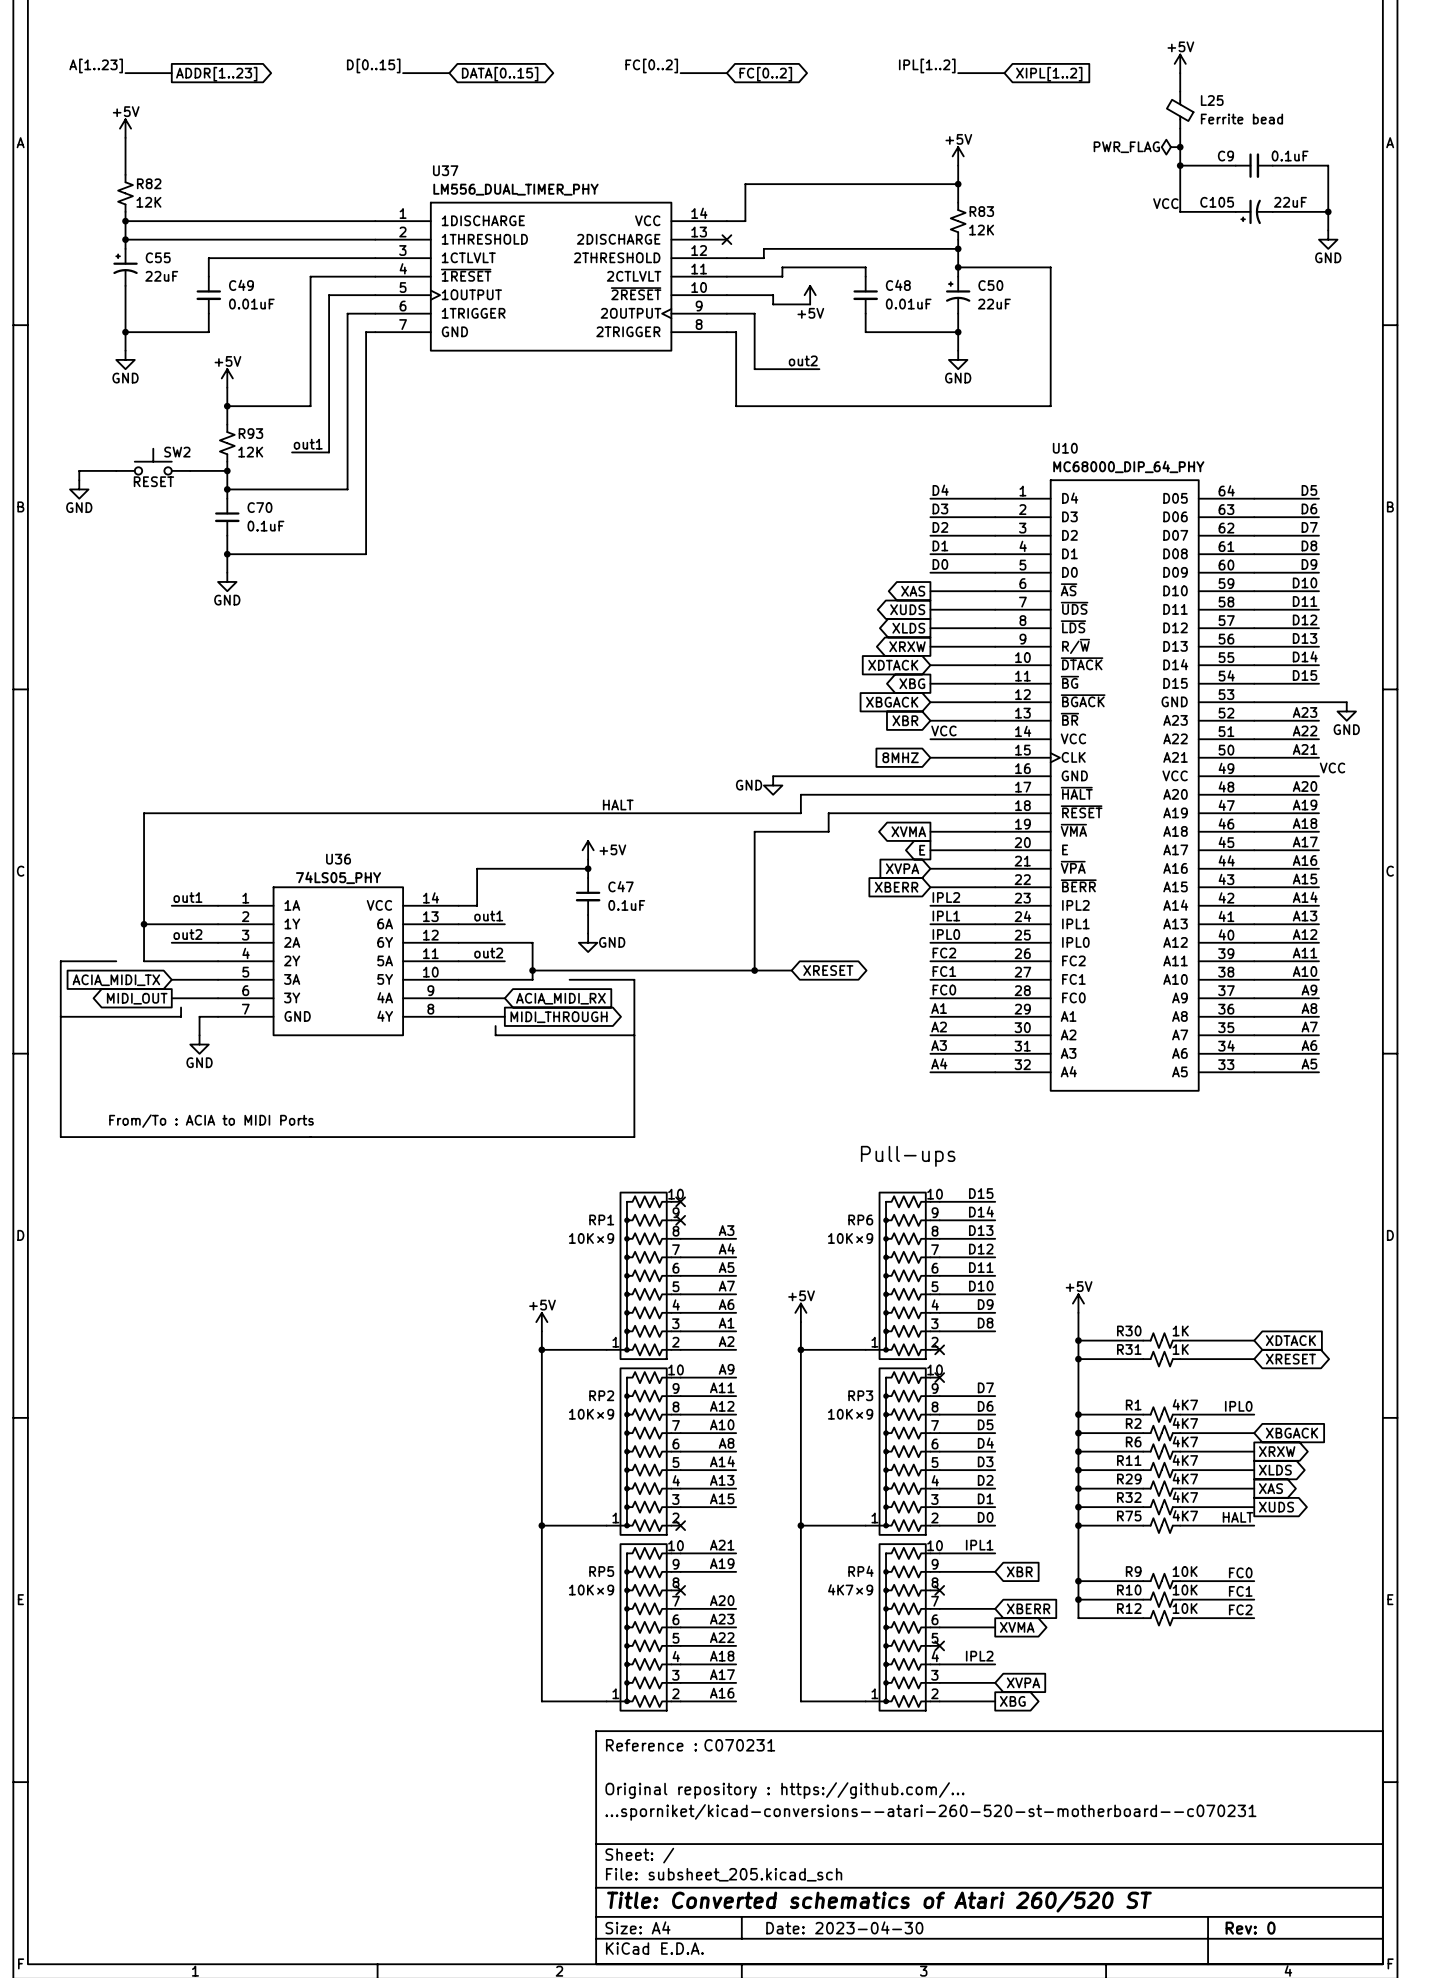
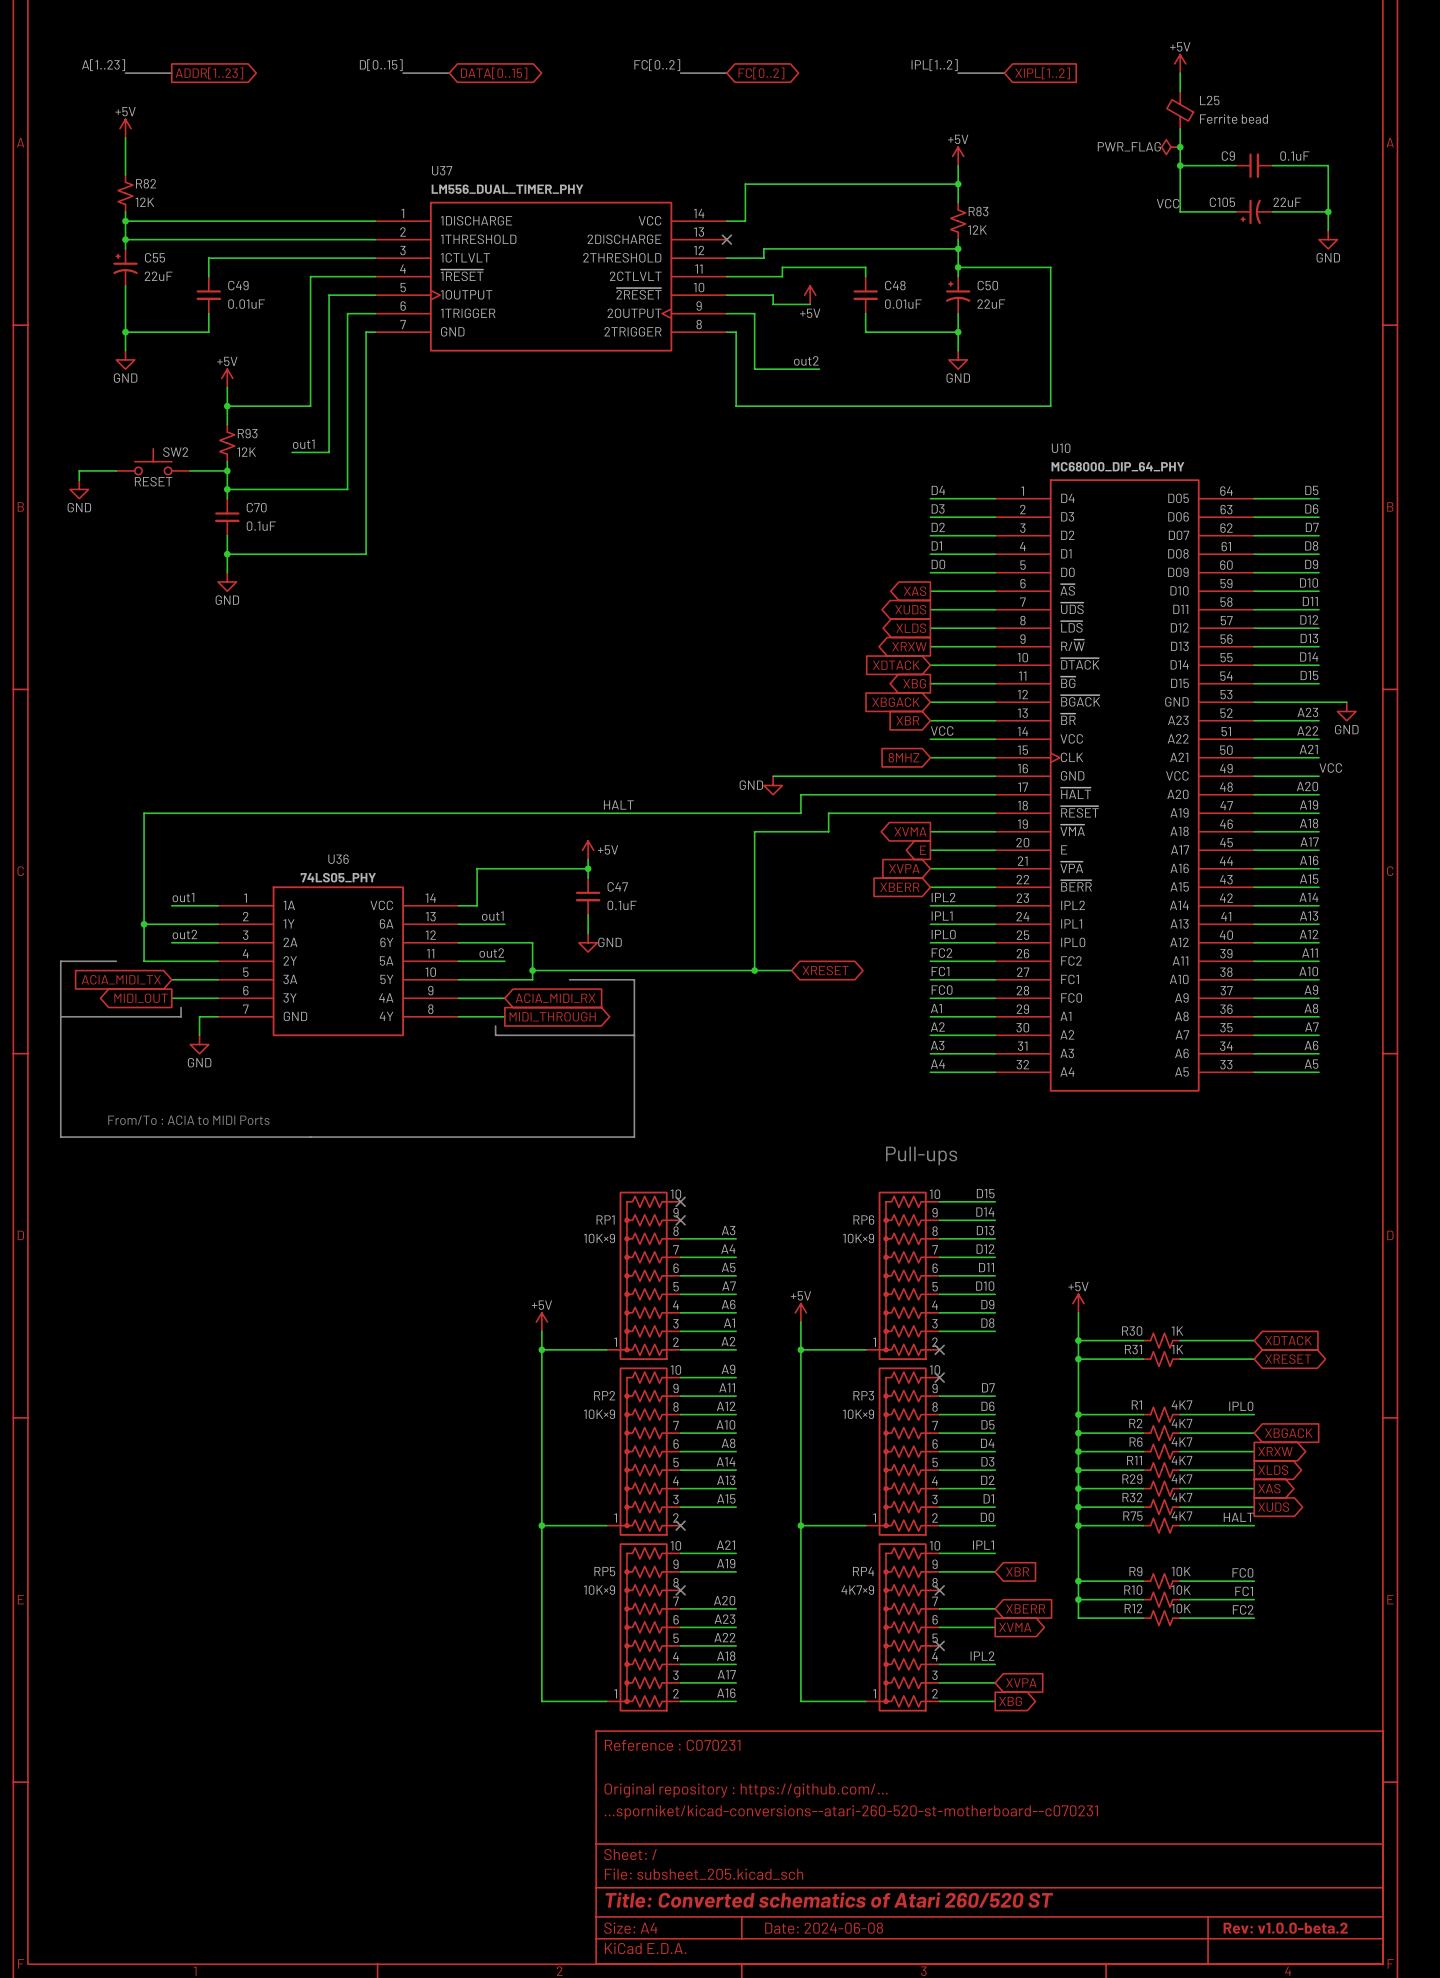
title block: Date: 2023-04-30 (844, 1927) -> Date: 2024-06-08 (824, 1928)
title block: Rev: 0 (1250, 1928) -> Rev: v1.0.0-beta.2 (1285, 1928)

